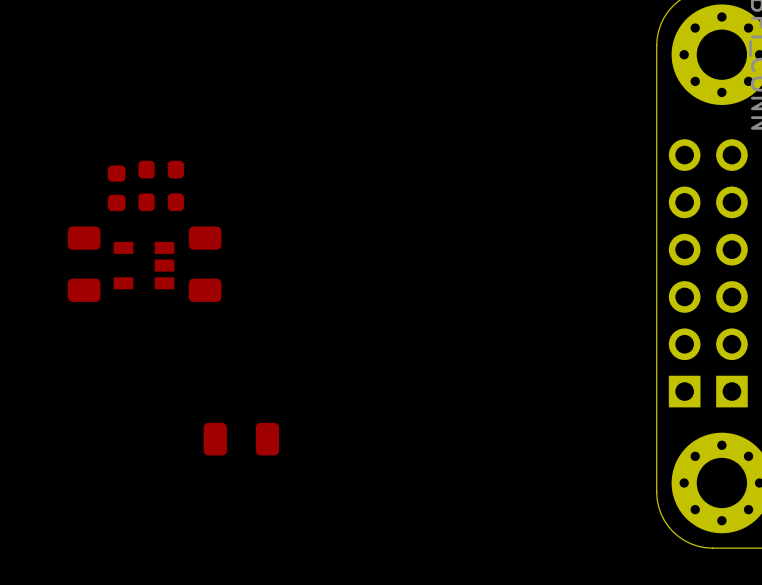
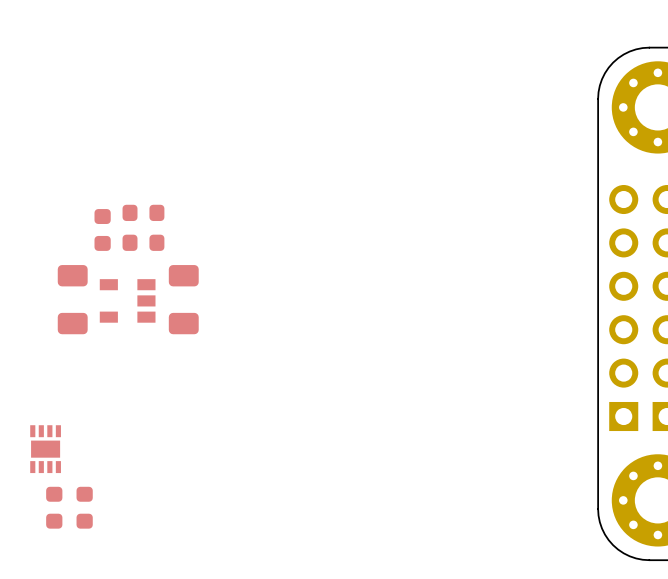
part: none -> (45, 449)
part: (241, 439) -> none
part: none -> (54, 507)
part: none -> (84, 507)

